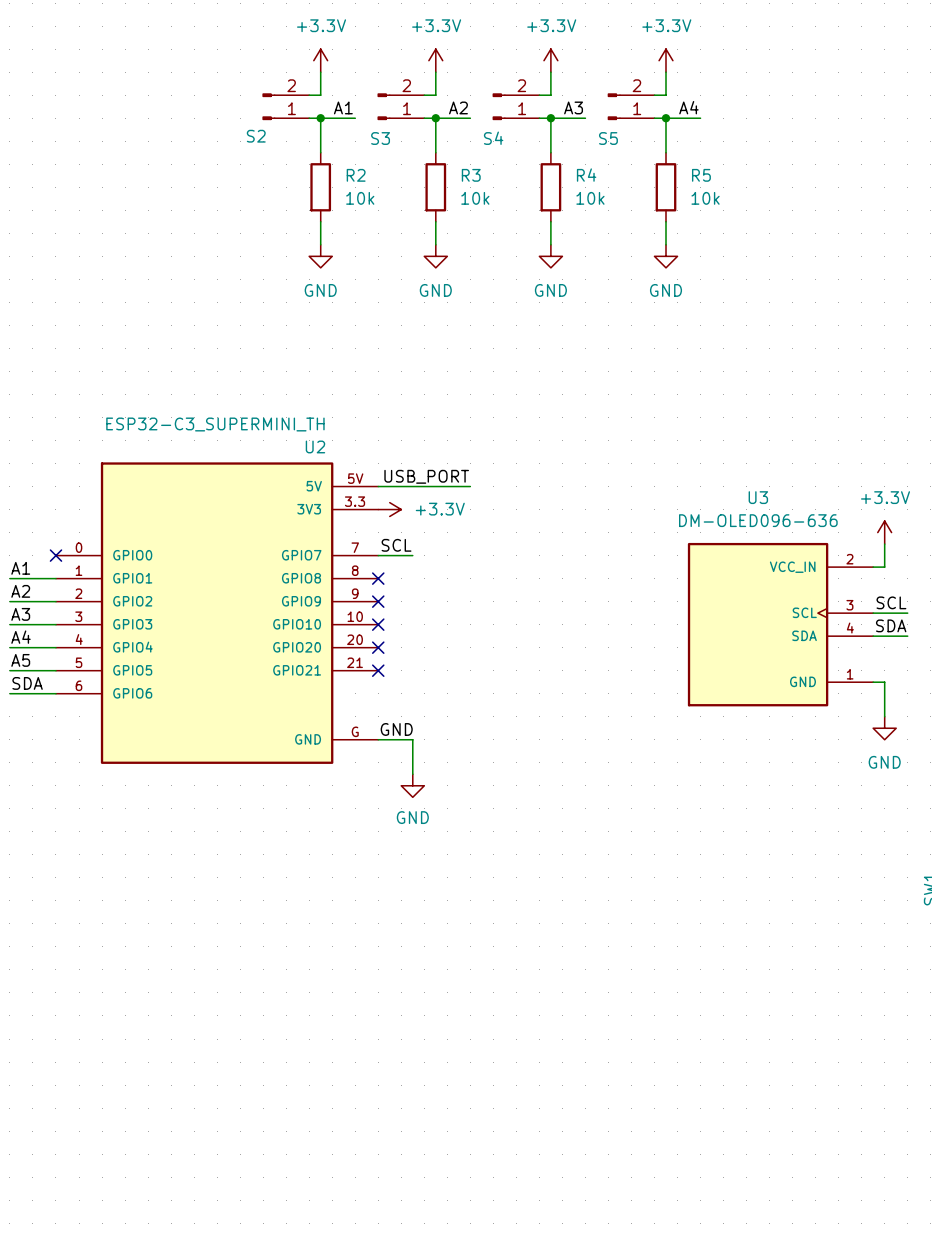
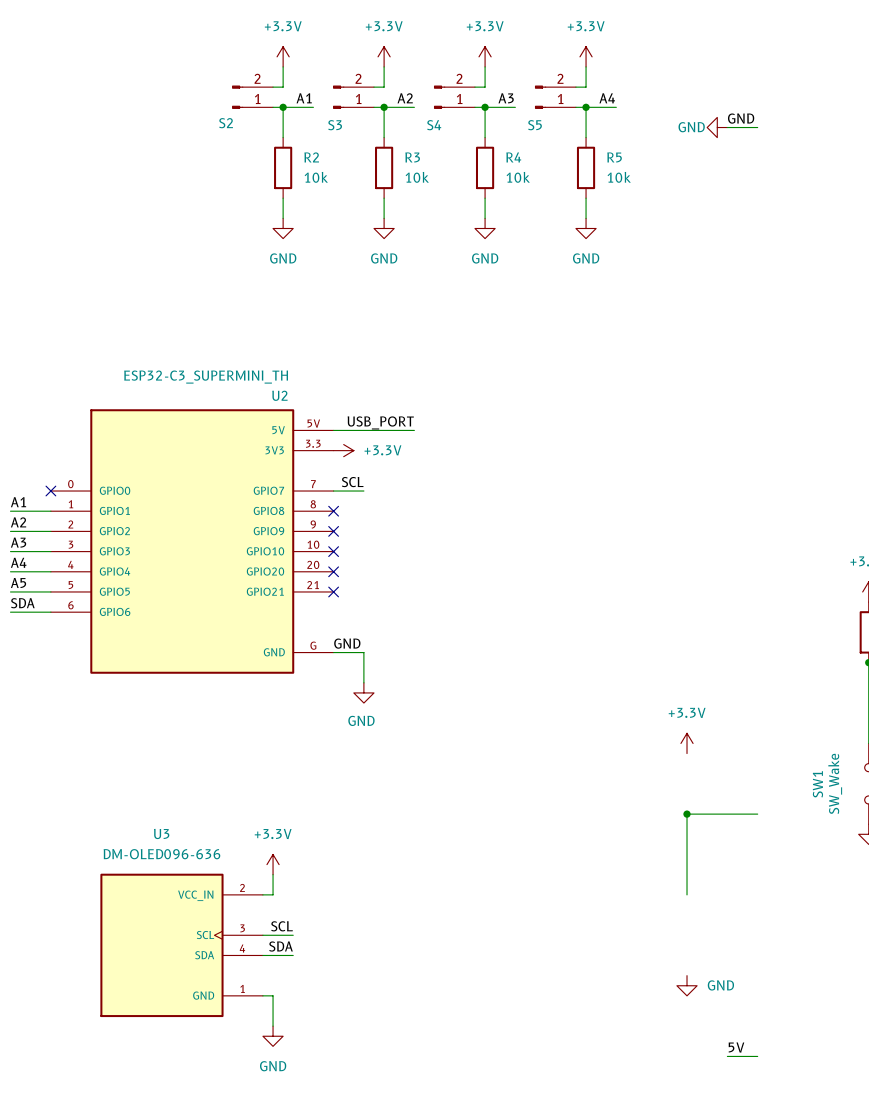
label: none -> GND (741, 118)
power symbol: none -> GND (717, 127)
wire: none -> (727, 127) (757, 127)
power symbol: +3.3V (884, 532) -> none
wire: (884, 544) (884, 567) (873, 567) -> none
label: SCL (891, 602) -> none
wire: (873, 613) (907, 613) -> none
U3 position: (780, 624) -> (181, 945)
label: SDA (891, 625) -> none
wire: (873, 636) (907, 636) -> none
wire: (873, 682) (884, 682) (884, 716) -> none
power symbol: GND (884, 728) -> none
power symbol: none -> +3.3V (687, 743)
junction: none -> (687, 814)
wire: none -> (757, 814) (687, 814) (687, 894)
power symbol: none -> +3.3V (273, 864)
wire: none -> (273, 874) (273, 894) (262, 894)
label: none -> SCL (282, 926)
wire: none -> (262, 935) (293, 935)
label: none -> SDA (280, 946)
wire: none -> (262, 955) (293, 955)
power symbol: none -> GND (687, 985)
wire: none -> (262, 995) (273, 995) (273, 1026)
power symbol: none -> GND (273, 1036)
label: none -> 5V (736, 1047)
wire: none -> (727, 1056) (757, 1056)

